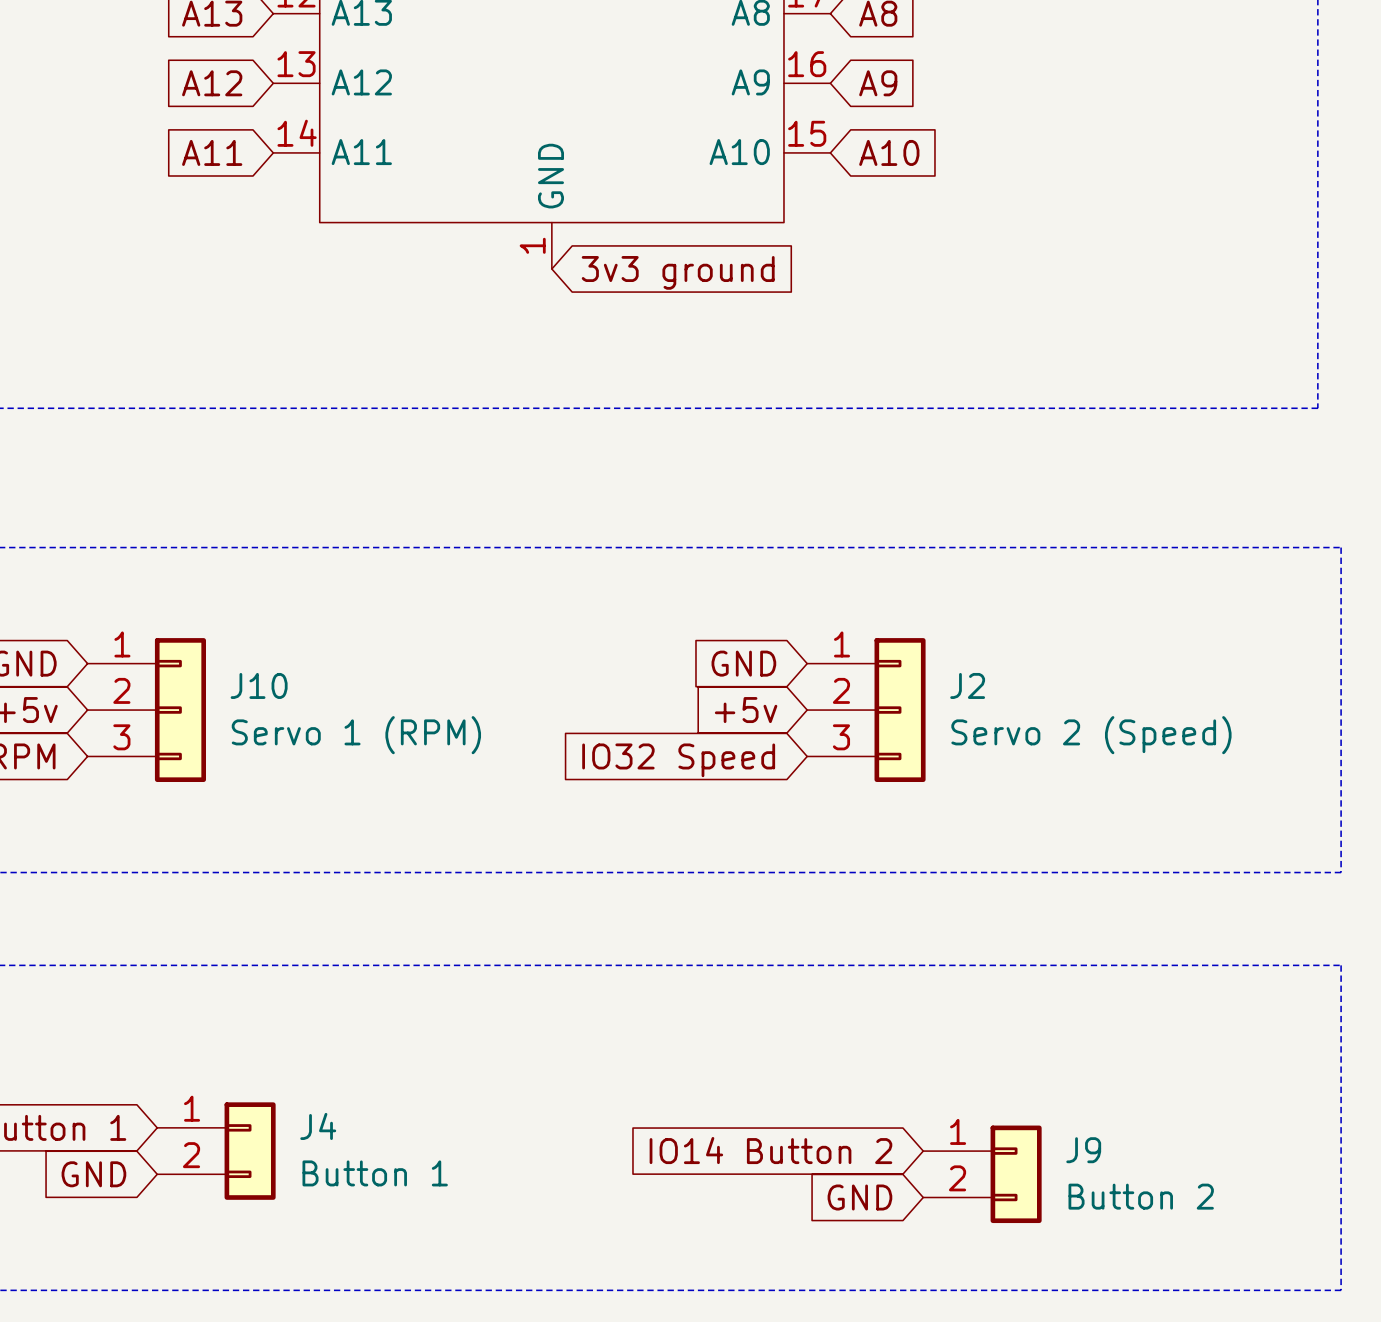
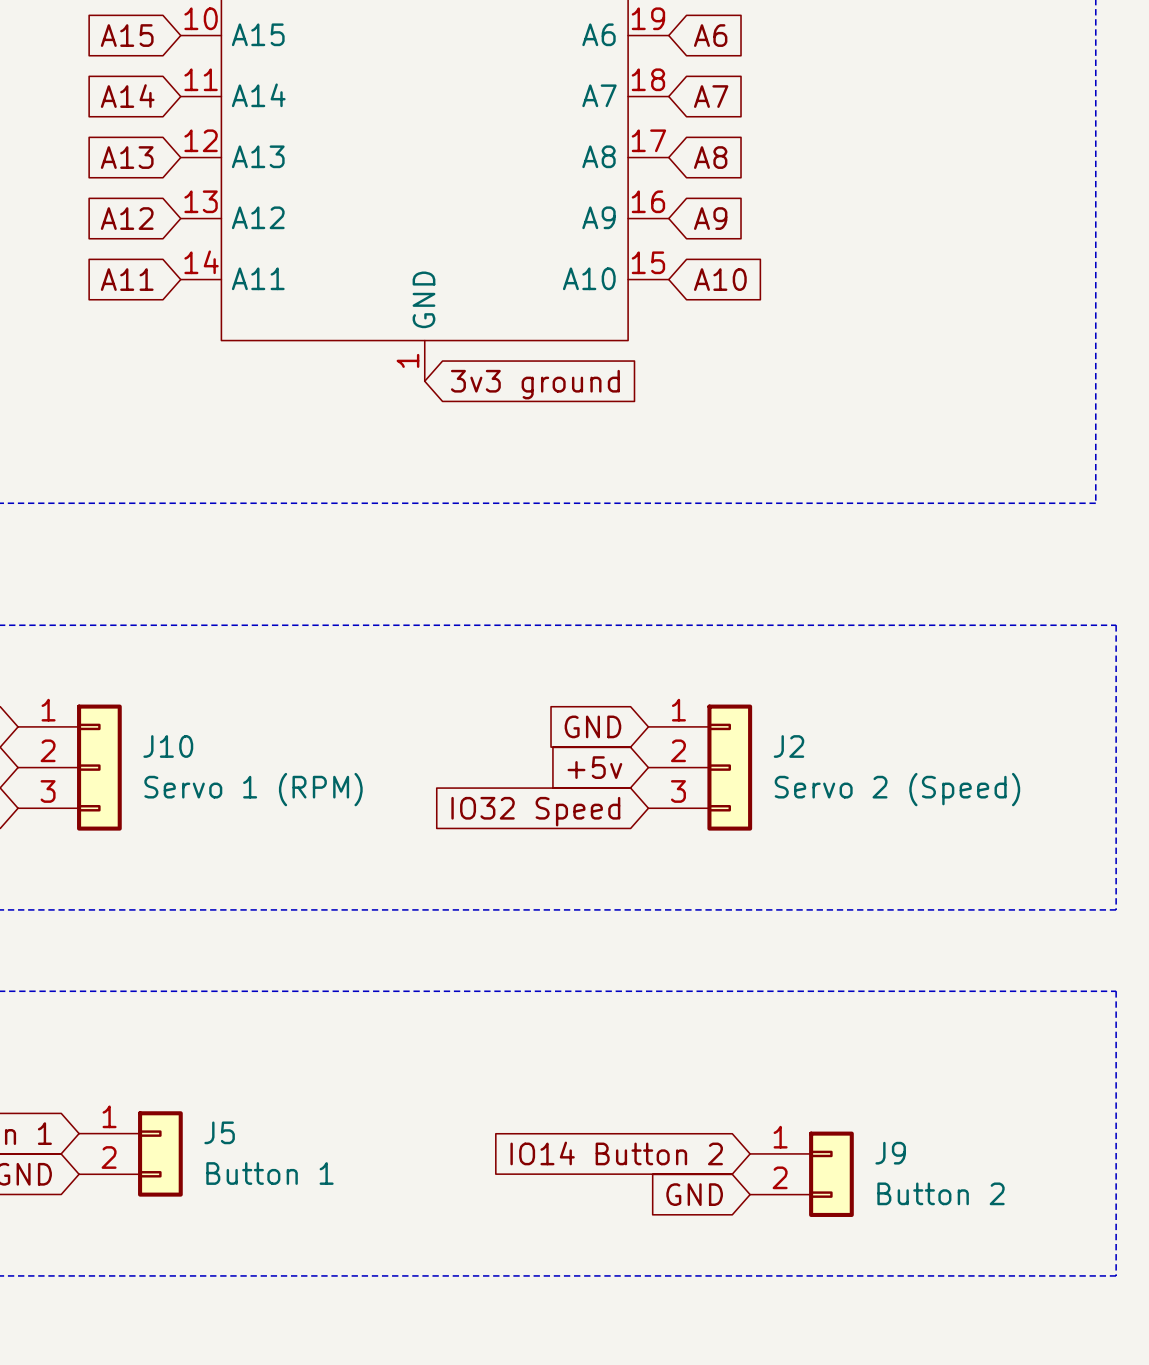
J4 name: J4 (318, 1126) -> J5 (219, 1132)

